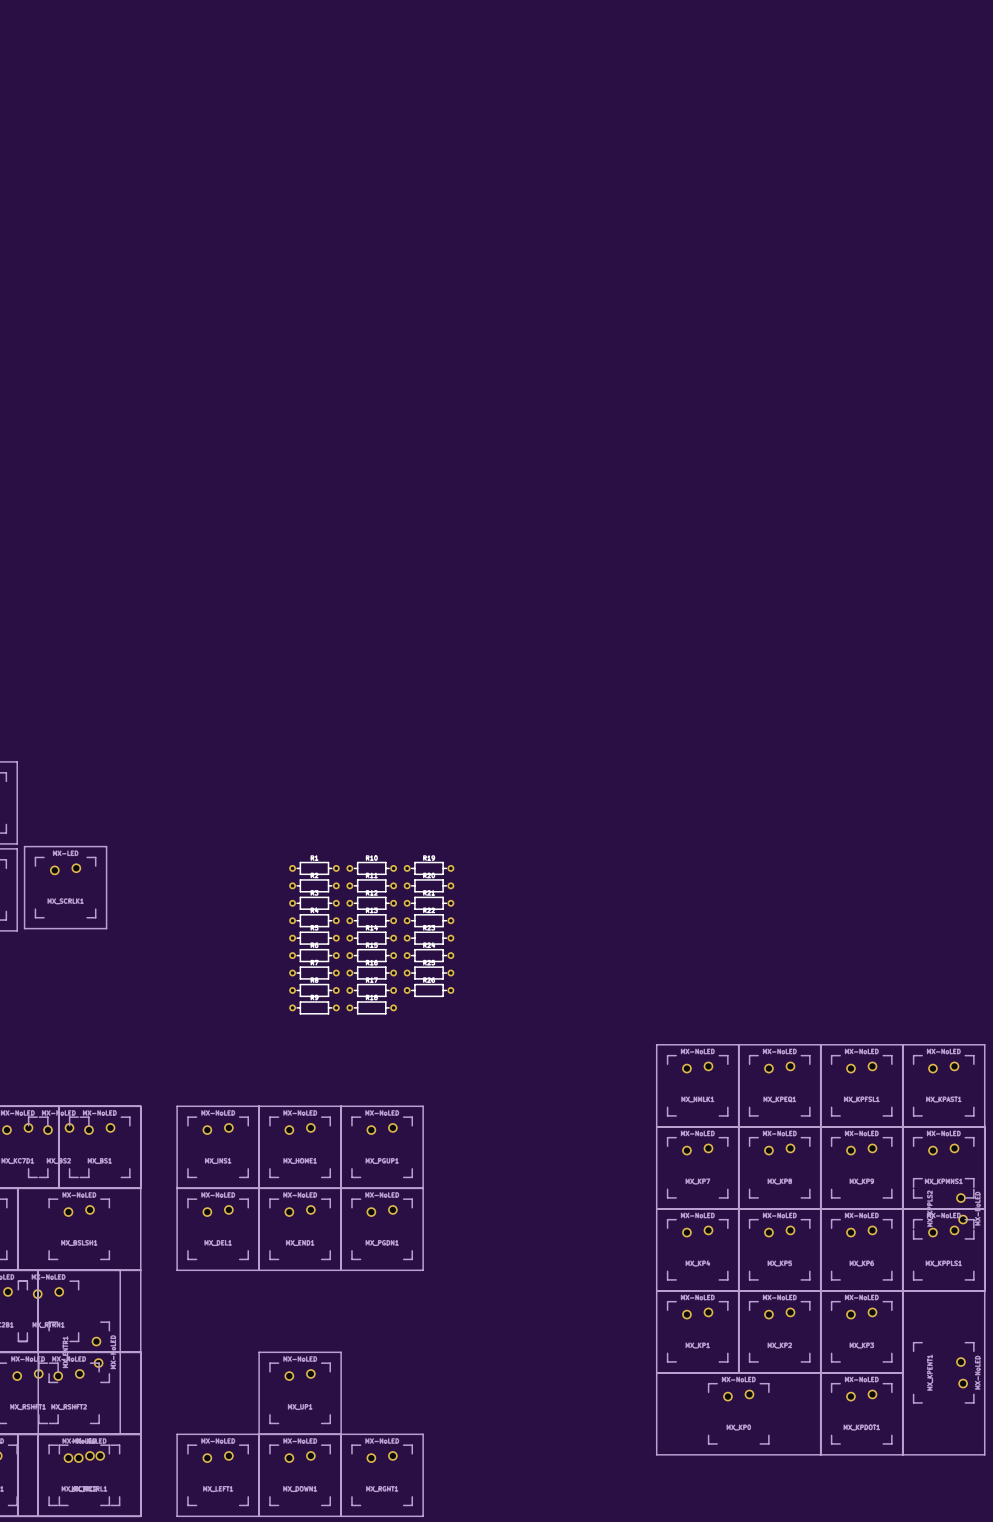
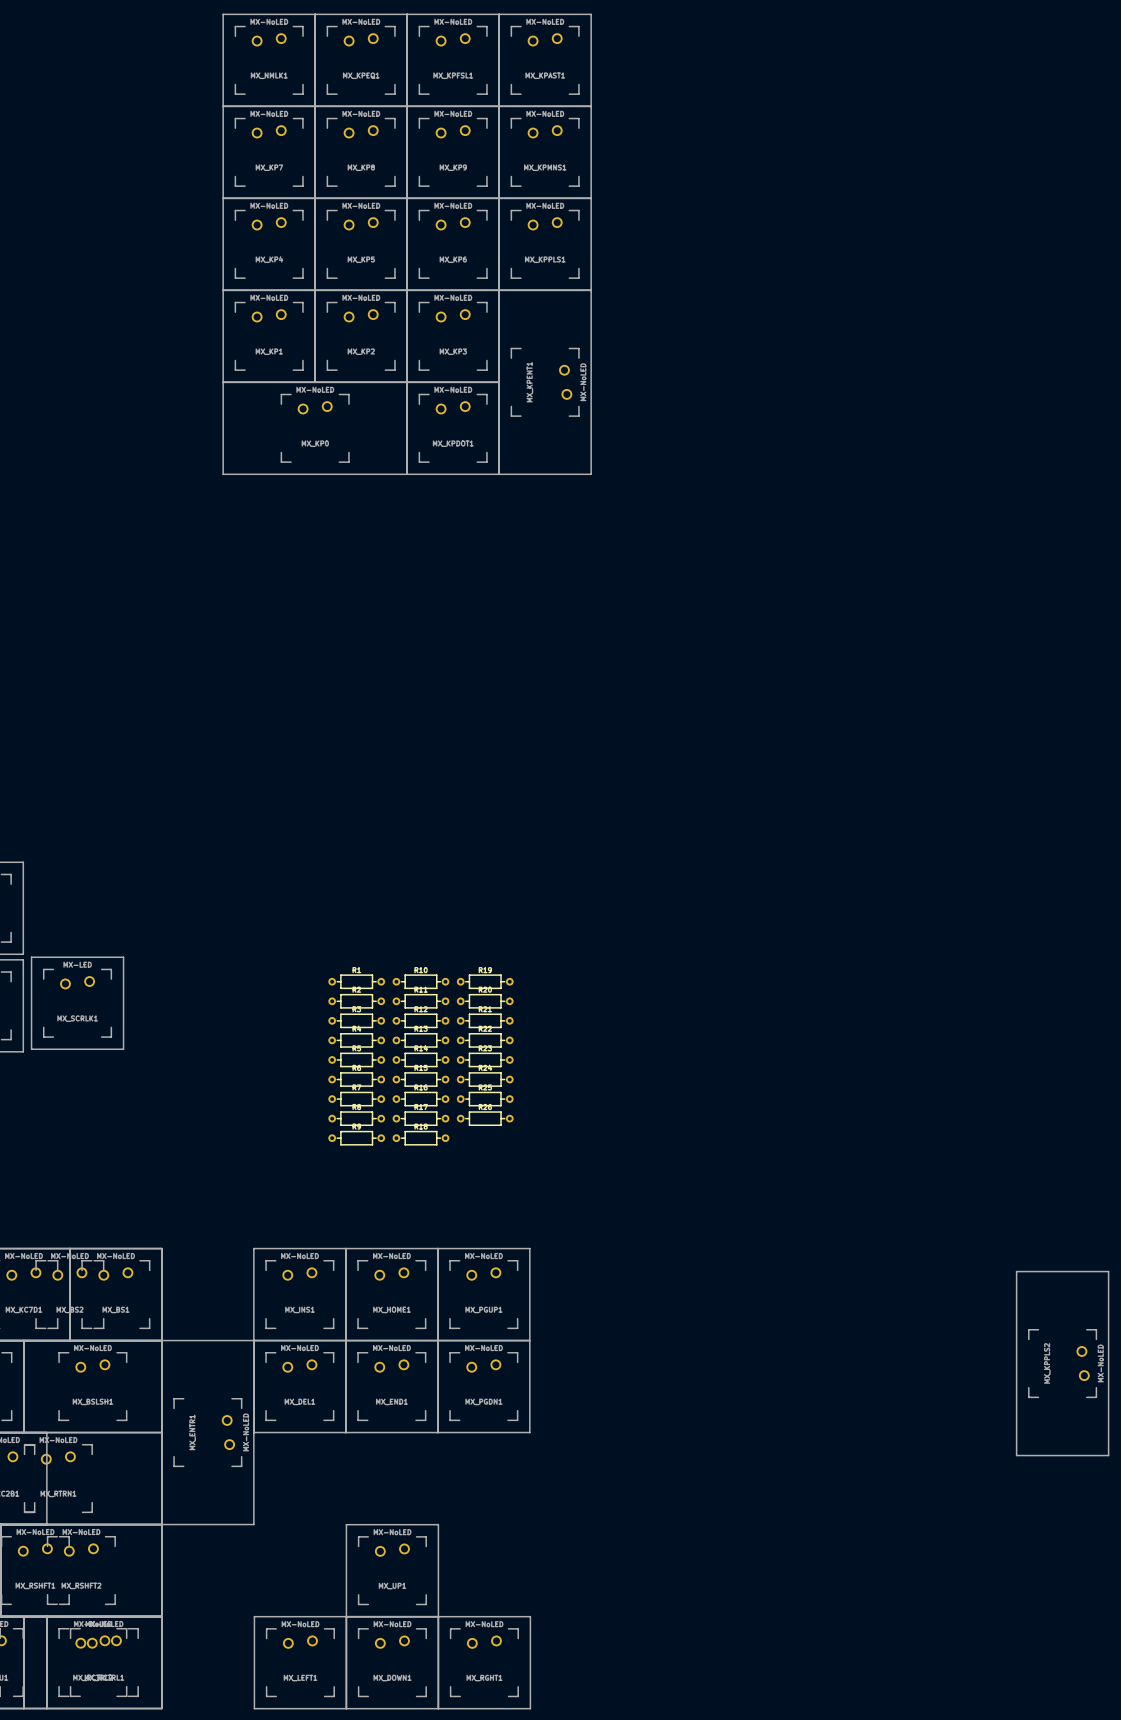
part position: (697, 1085) -> (269, 60)
part position: (779, 1085) -> (361, 60)
part position: (861, 1085) -> (453, 60)
part position: (943, 1085) -> (545, 60)
part position: (218, 1147) -> (299, 1294)
part position: (300, 1147) -> (391, 1294)
part position: (382, 1147) -> (483, 1294)
part position: (697, 1167) -> (269, 152)
part position: (779, 1167) -> (361, 152)
part position: (861, 1167) -> (453, 152)
part position: (943, 1167) -> (545, 152)
part position: (218, 1229) -> (299, 1386)
part position: (300, 1229) -> (391, 1386)
part position: (382, 1229) -> (483, 1386)
part position: (697, 1249) -> (269, 244)
part position: (779, 1249) -> (361, 244)
part position: (861, 1249) -> (453, 244)
part position: (943, 1249) -> (545, 244)
part position: (697, 1331) -> (269, 336)
part position: (779, 1331) -> (361, 336)
part position: (861, 1331) -> (453, 336)
part position: (79, 1352) -> (207, 1432)
part position: (943, 1372) -> (545, 382)
part position: (300, 1393) -> (392, 1570)
part position: (738, 1413) -> (315, 428)
part position: (861, 1413) -> (453, 428)
part position: (218, 1475) -> (300, 1662)
part position: (300, 1475) -> (392, 1662)
part position: (382, 1475) -> (484, 1662)

